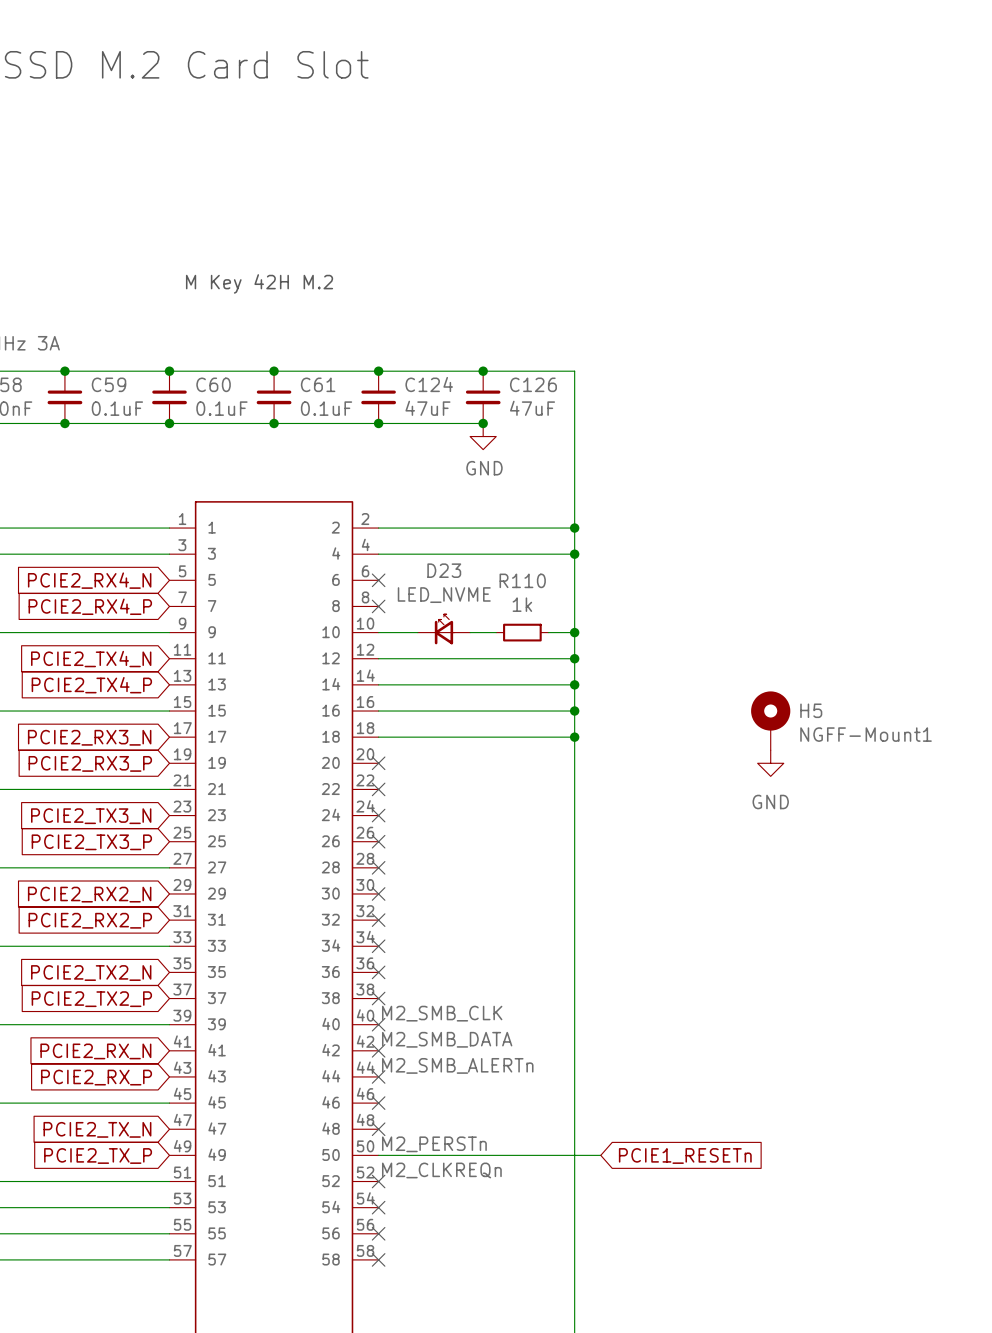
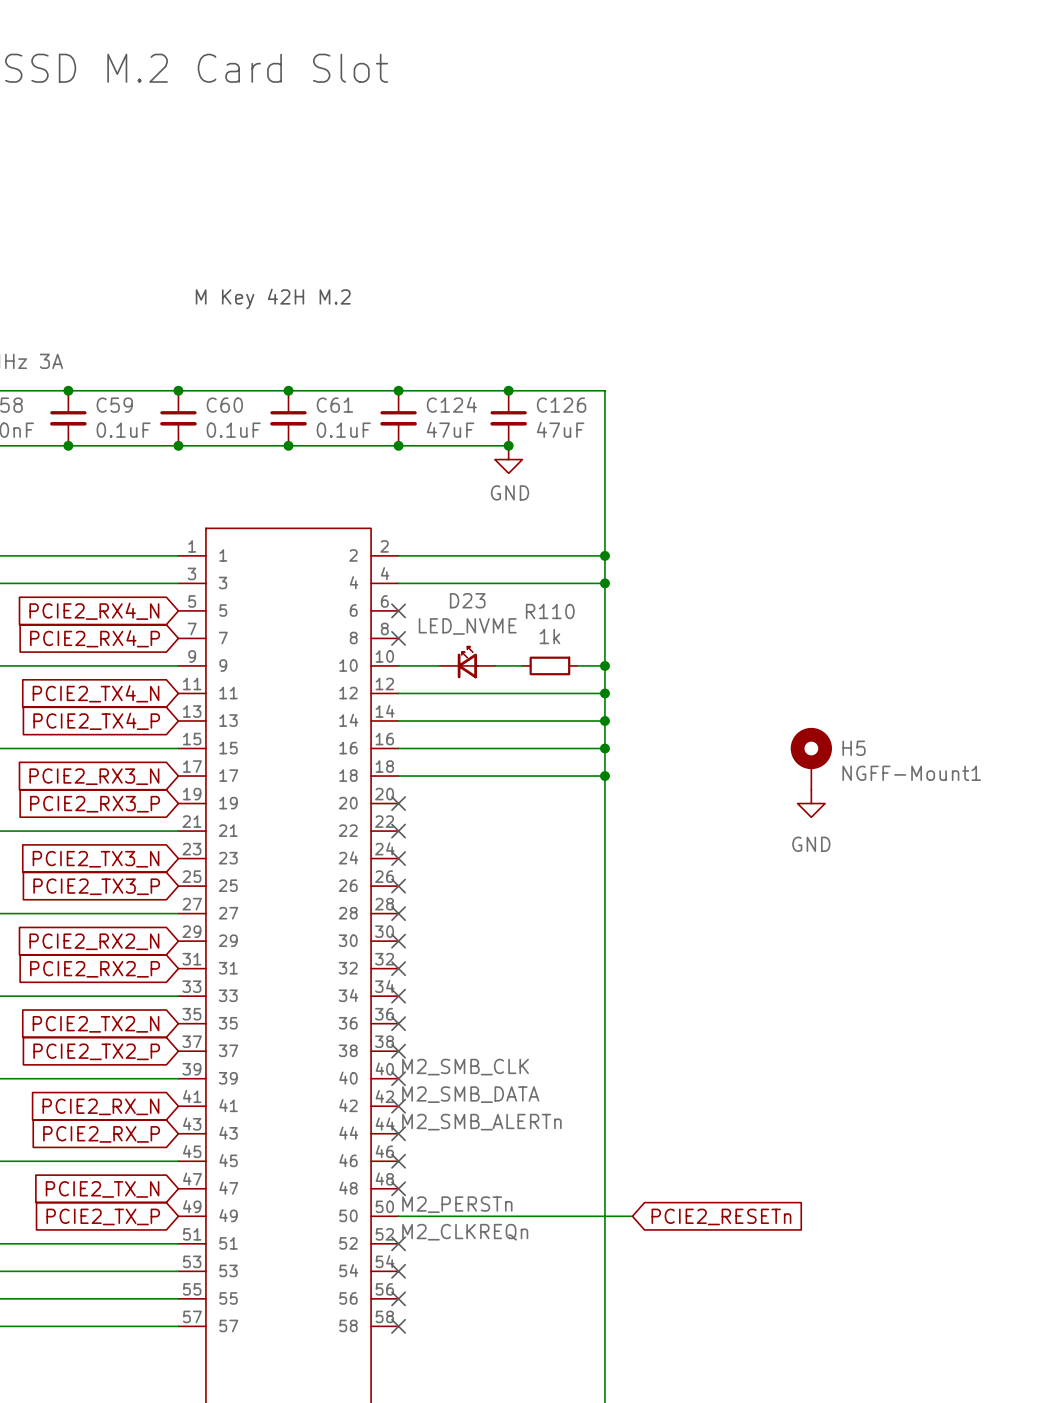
global label: PCIE1_RESETn (685, 1156) -> PCIE2_RESETn (721, 1216)

